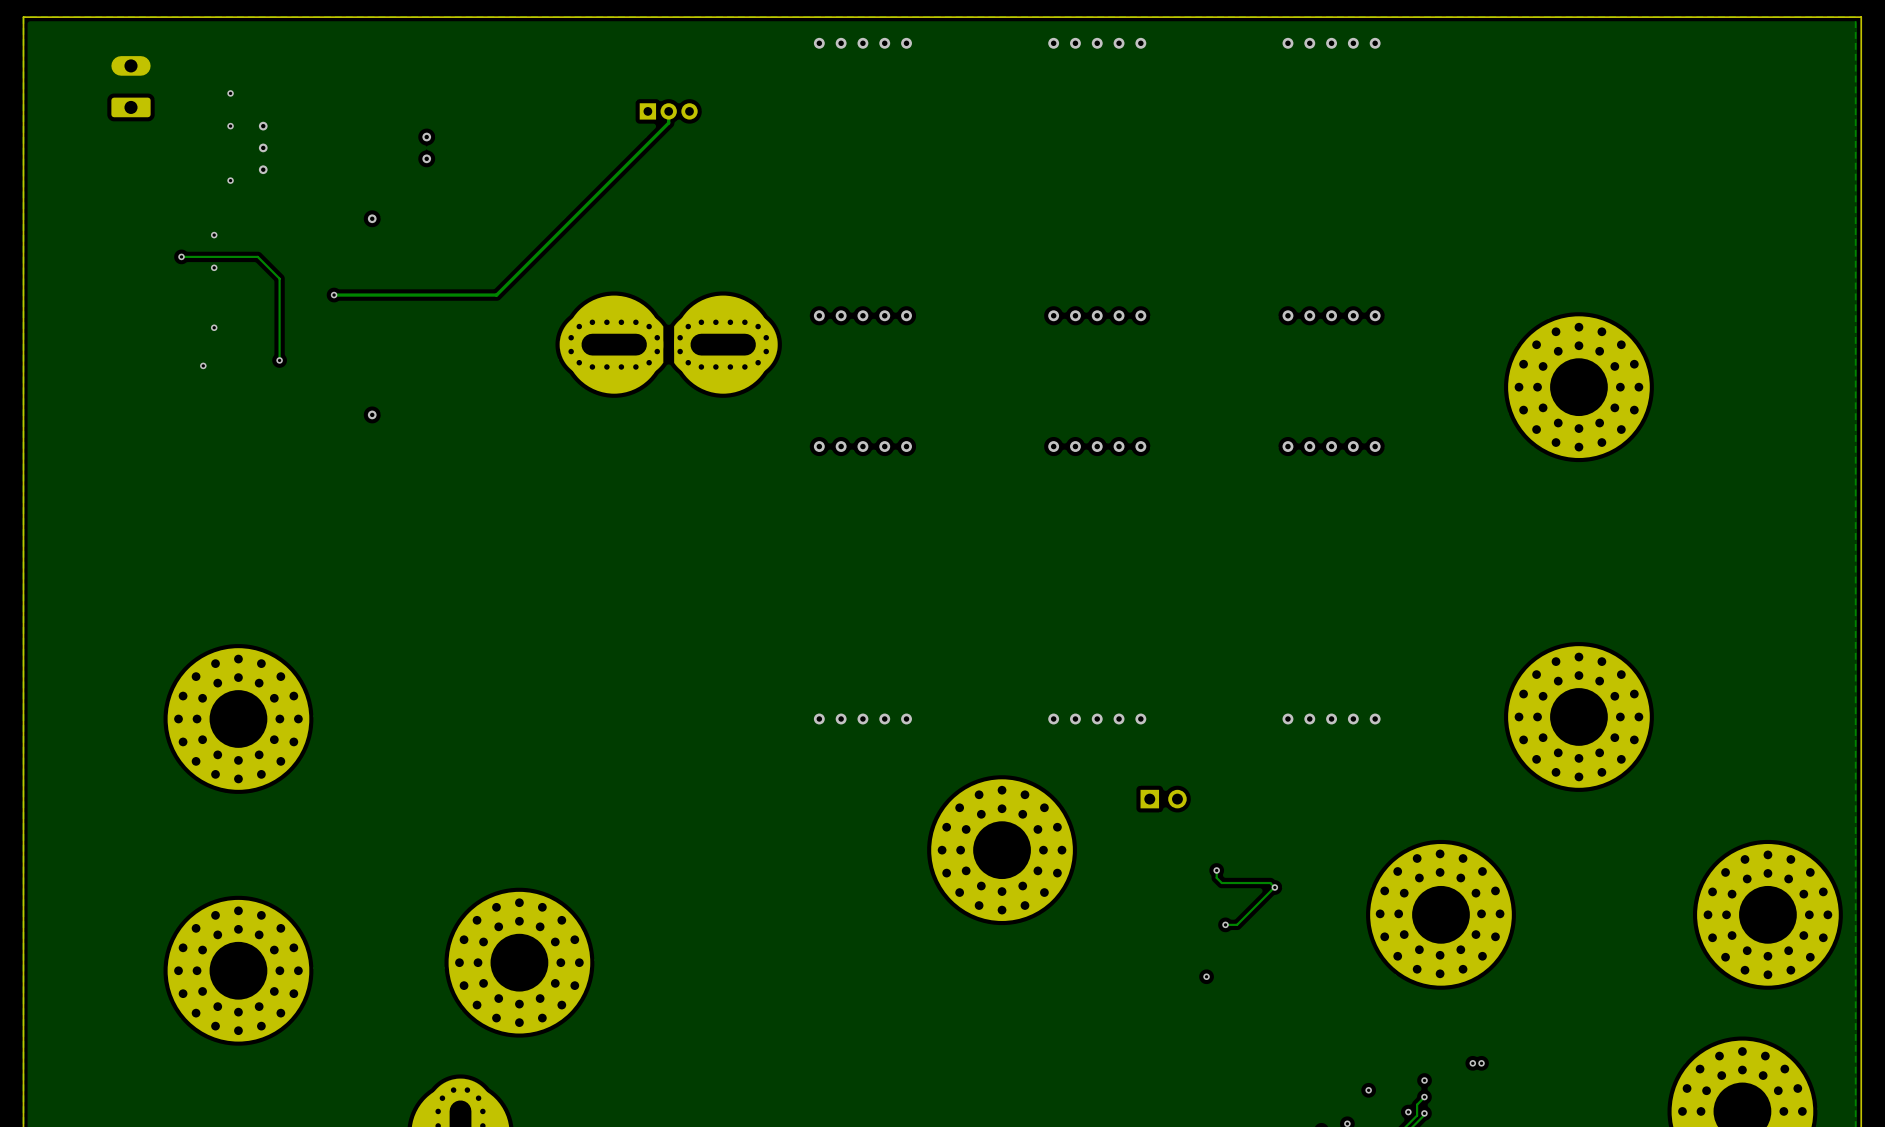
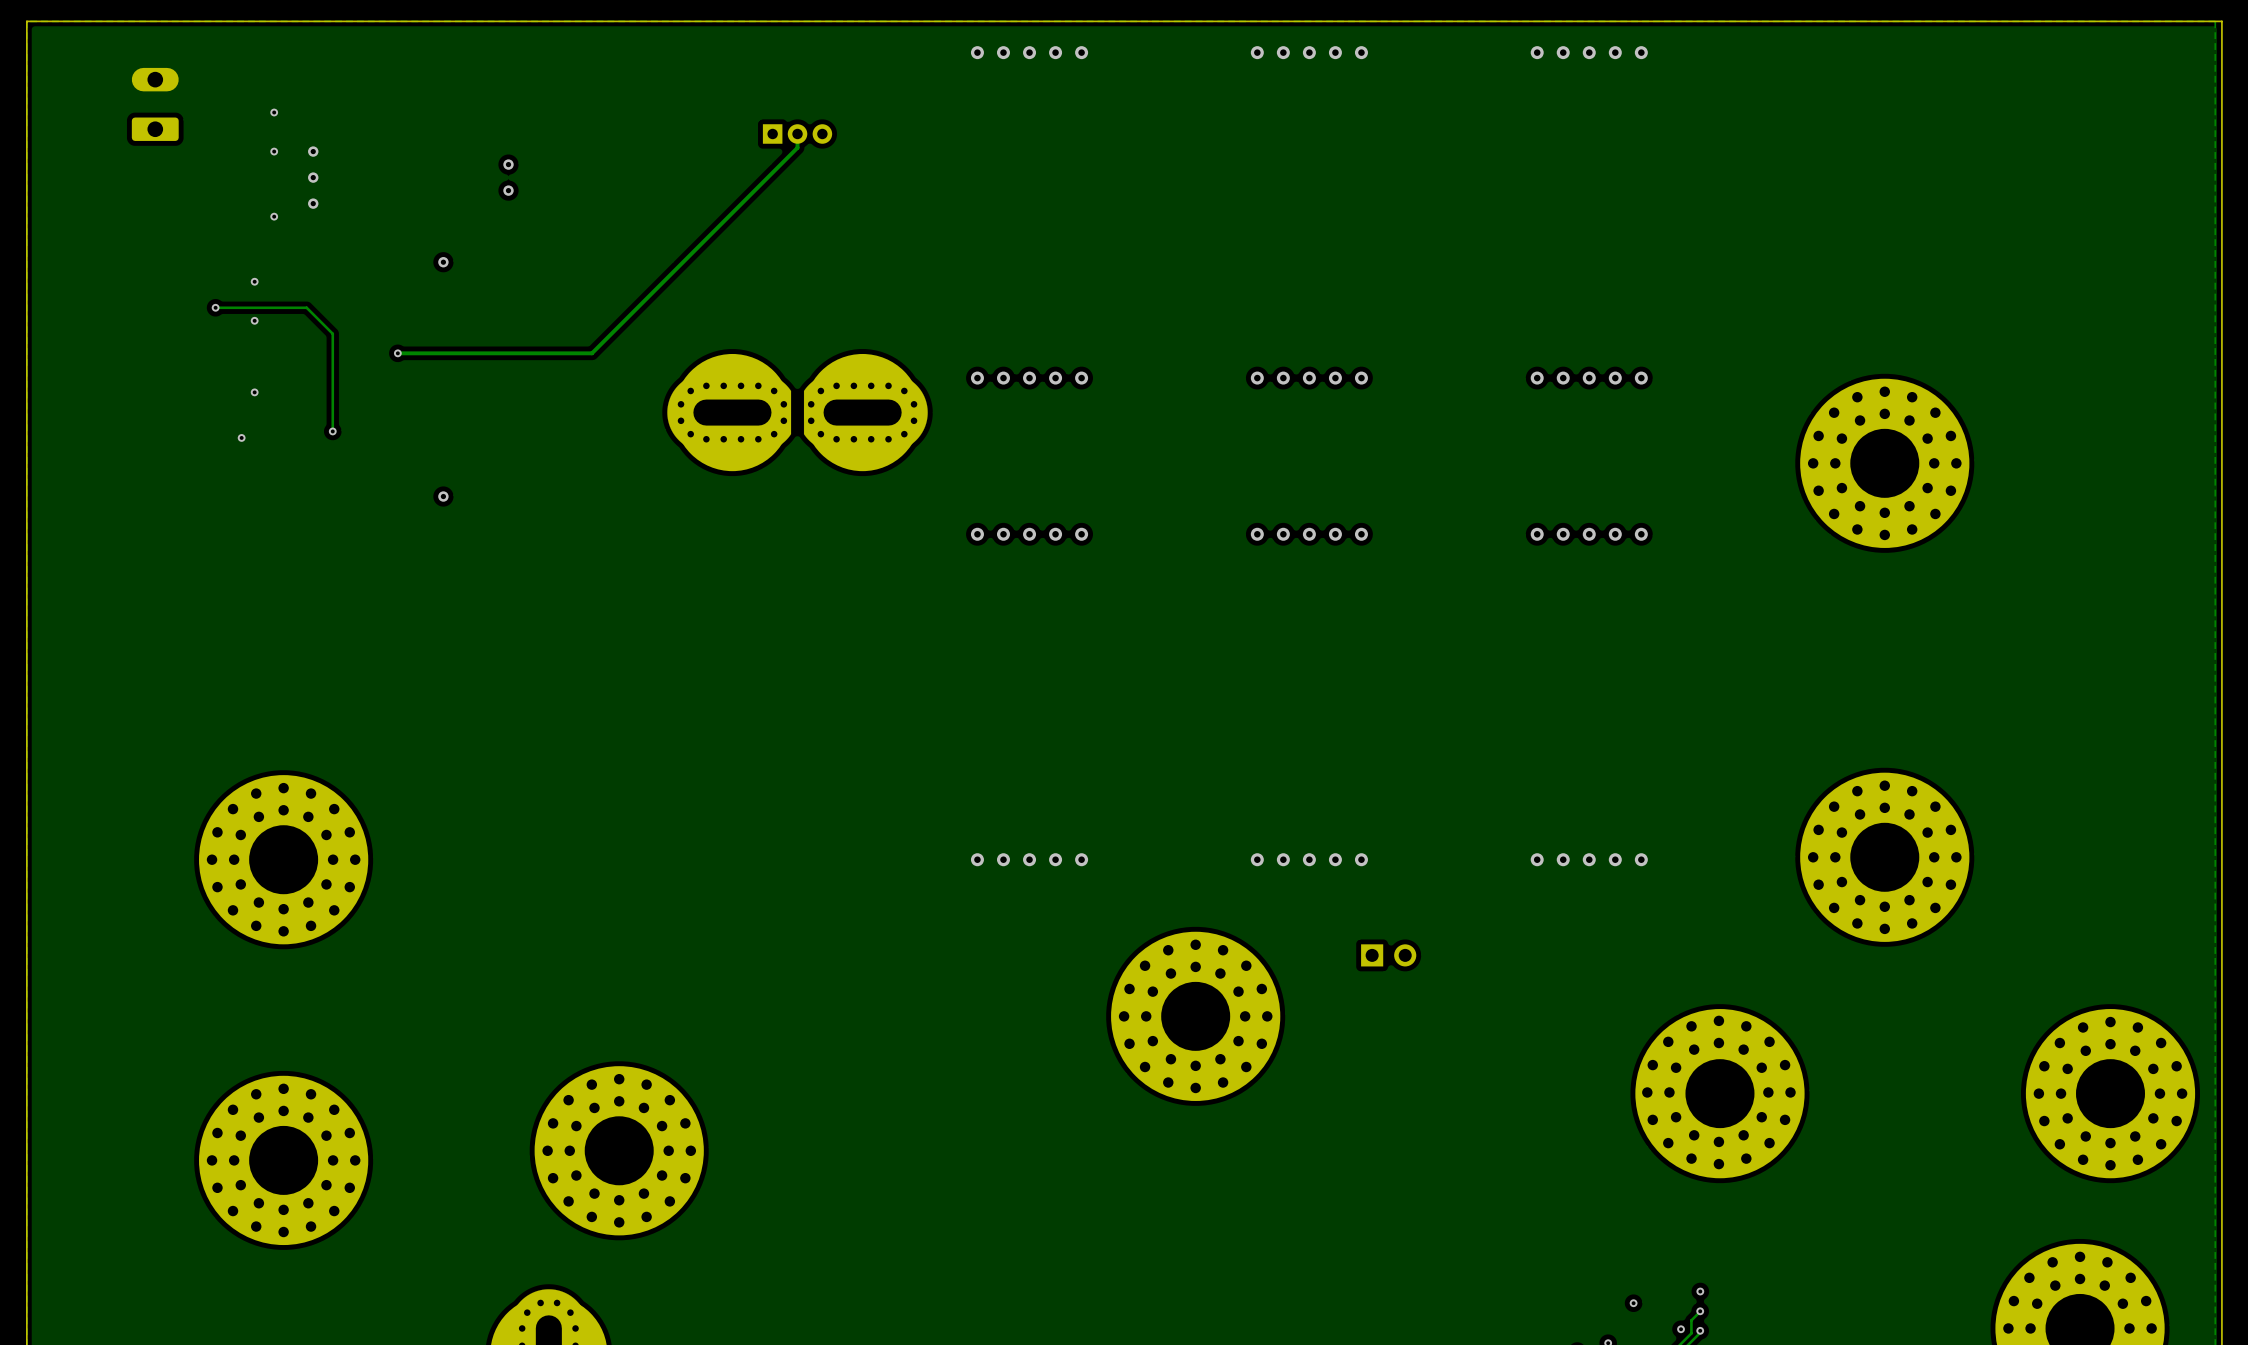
track: (1216, 870) (1216, 877) (1221, 883) (1270, 883) (1274, 887) (1237, 924) (1225, 924) -> none
via: (1216, 870) -> none
via: (1274, 887) -> none
via: (1225, 924) -> none
via: (1206, 976) -> none
via: (1472, 1063) -> none
via: (1481, 1063) -> none

